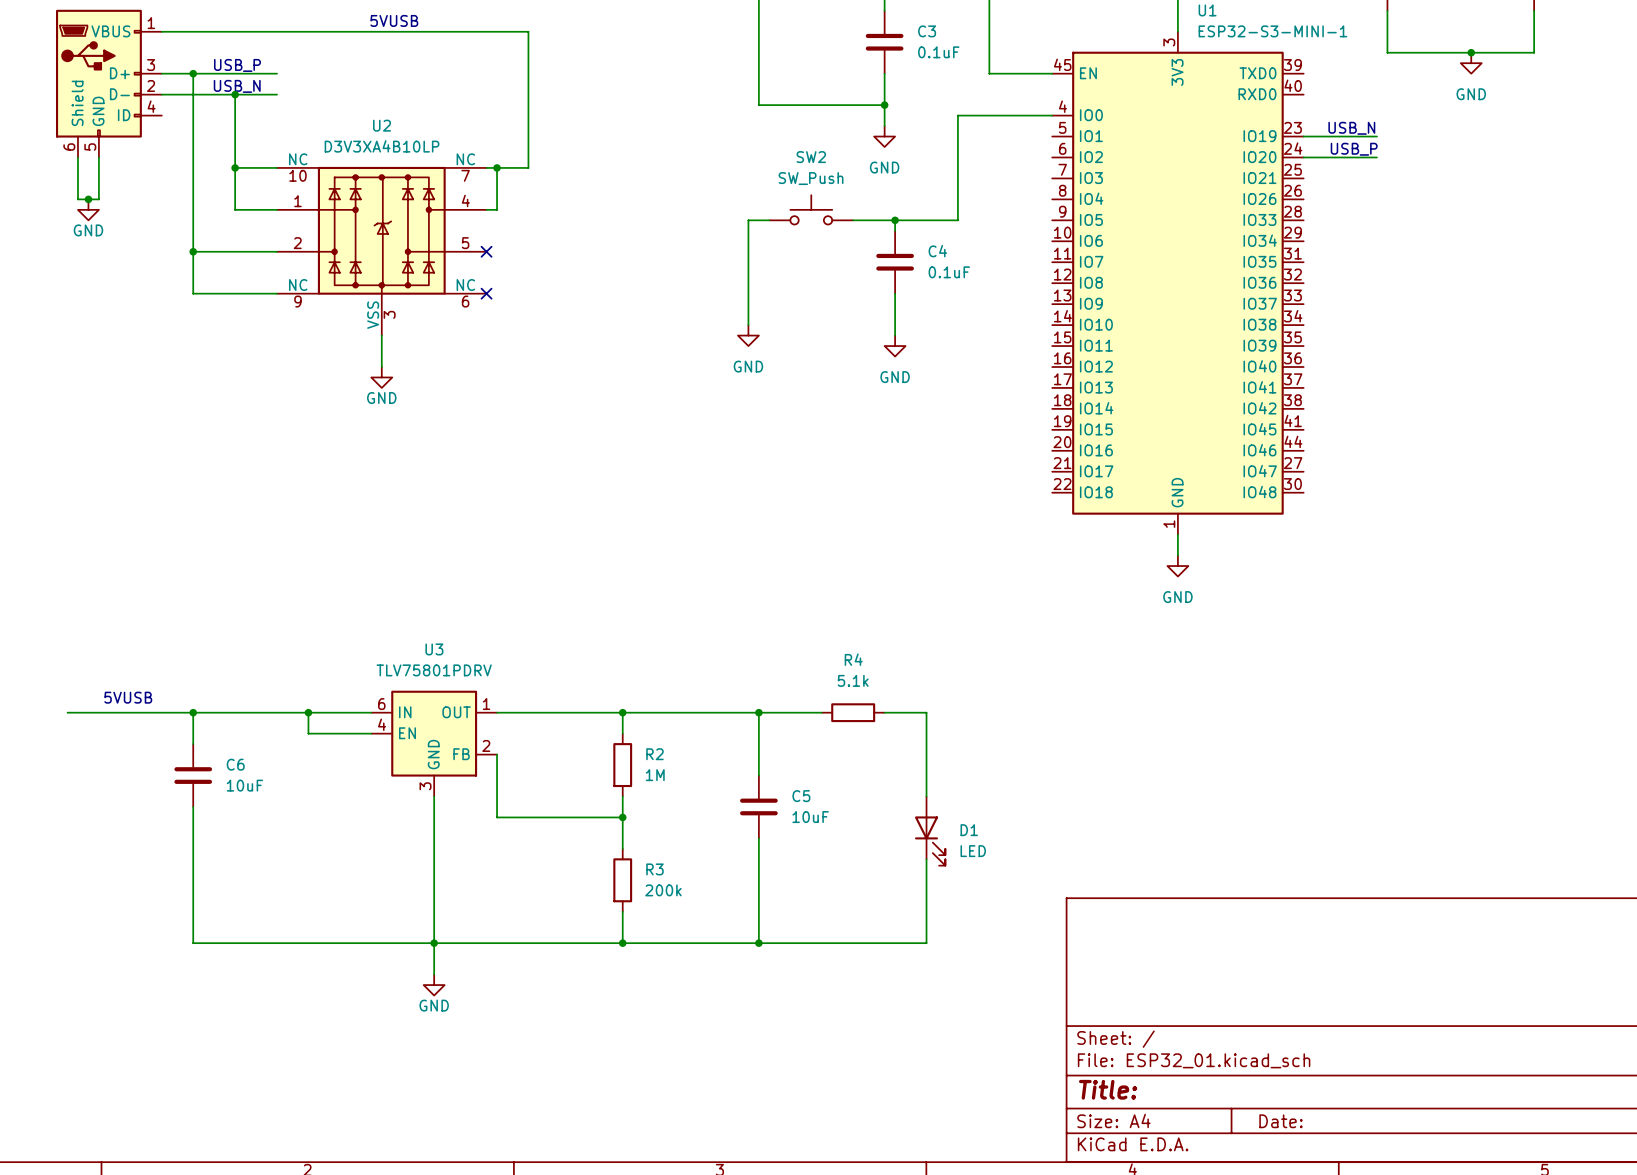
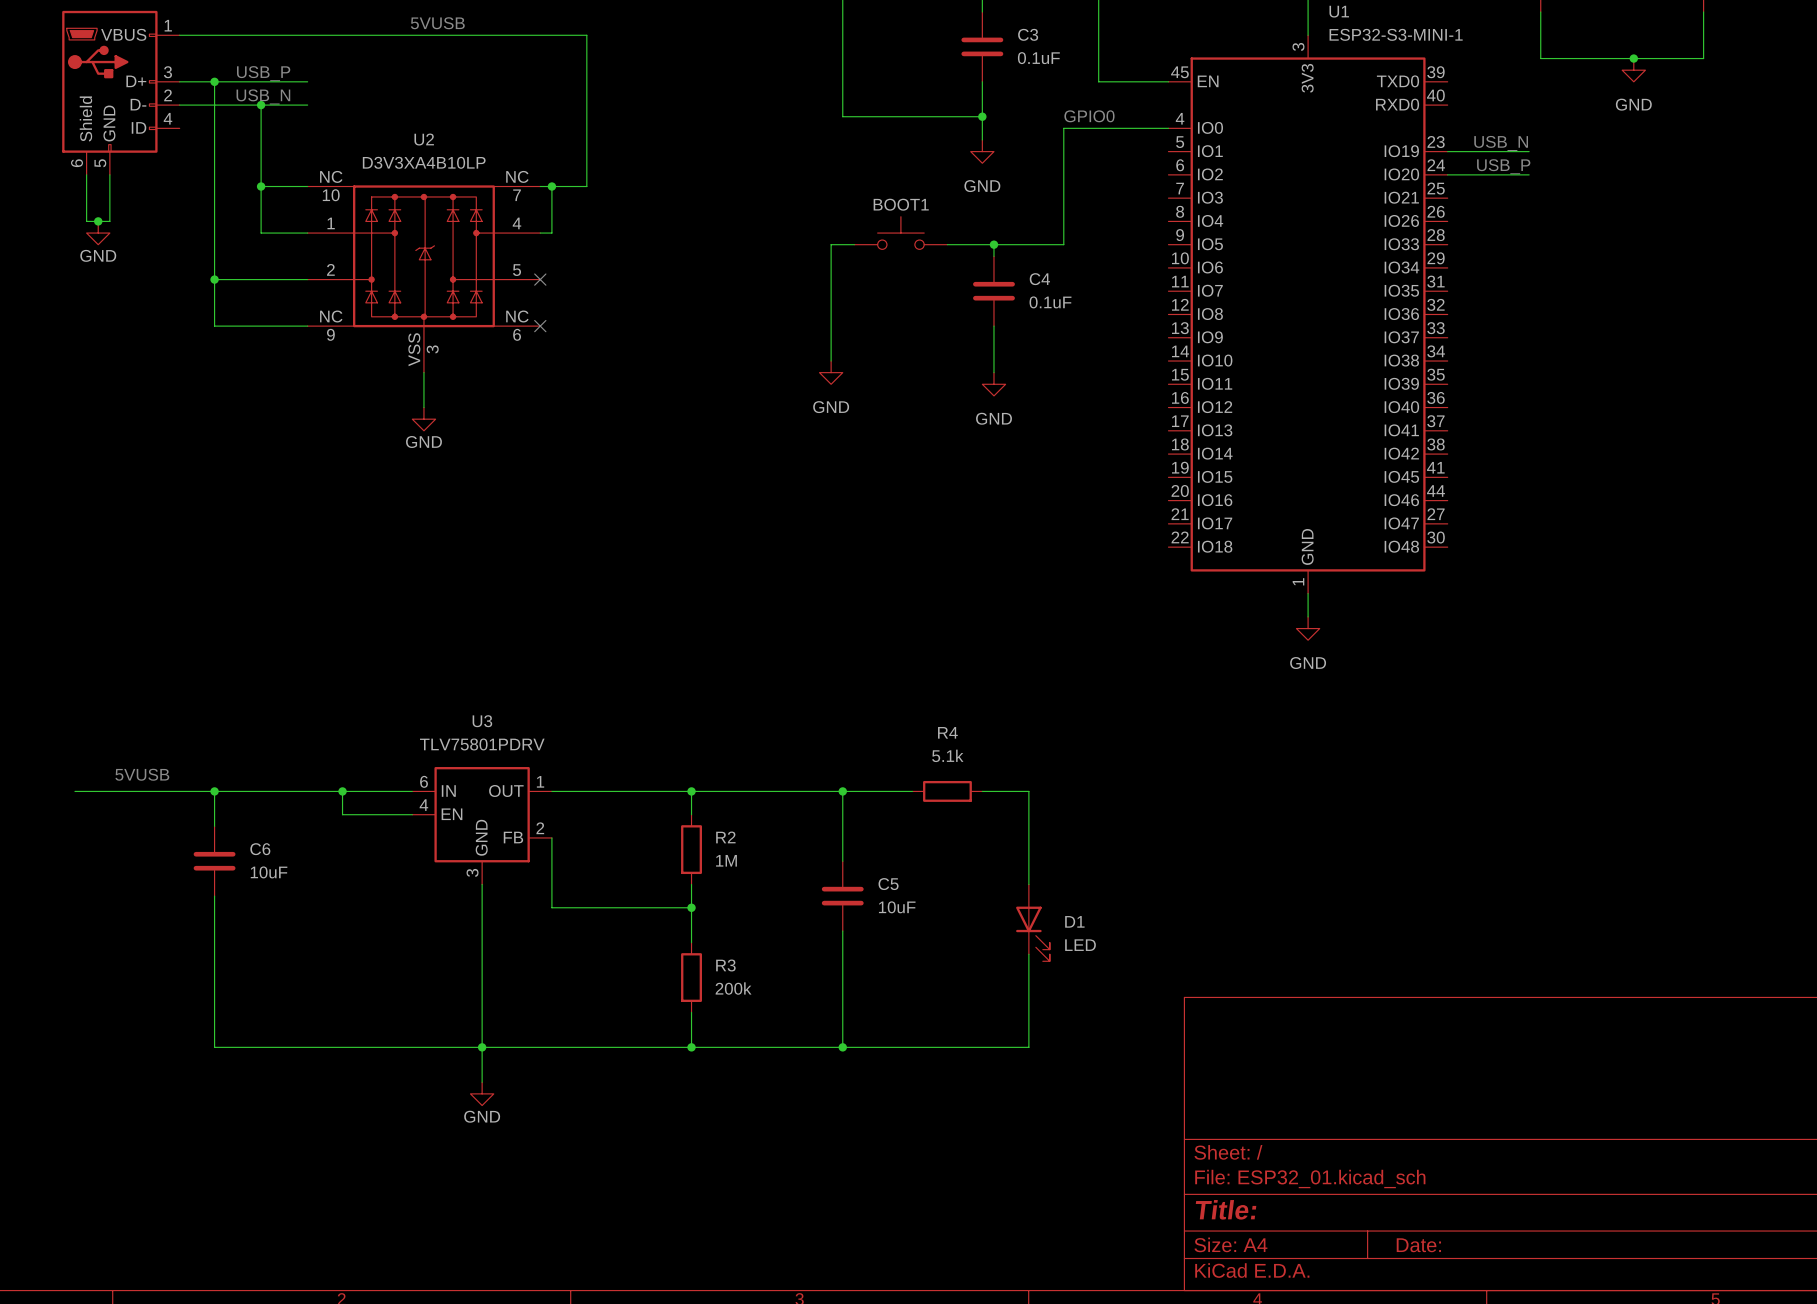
text: none -> GPIO0 (1089, 116)
SW2 name: SW2 (811, 157) -> BOOT1 (901, 204)
SW2 value: SW_Push (811, 178) -> none

